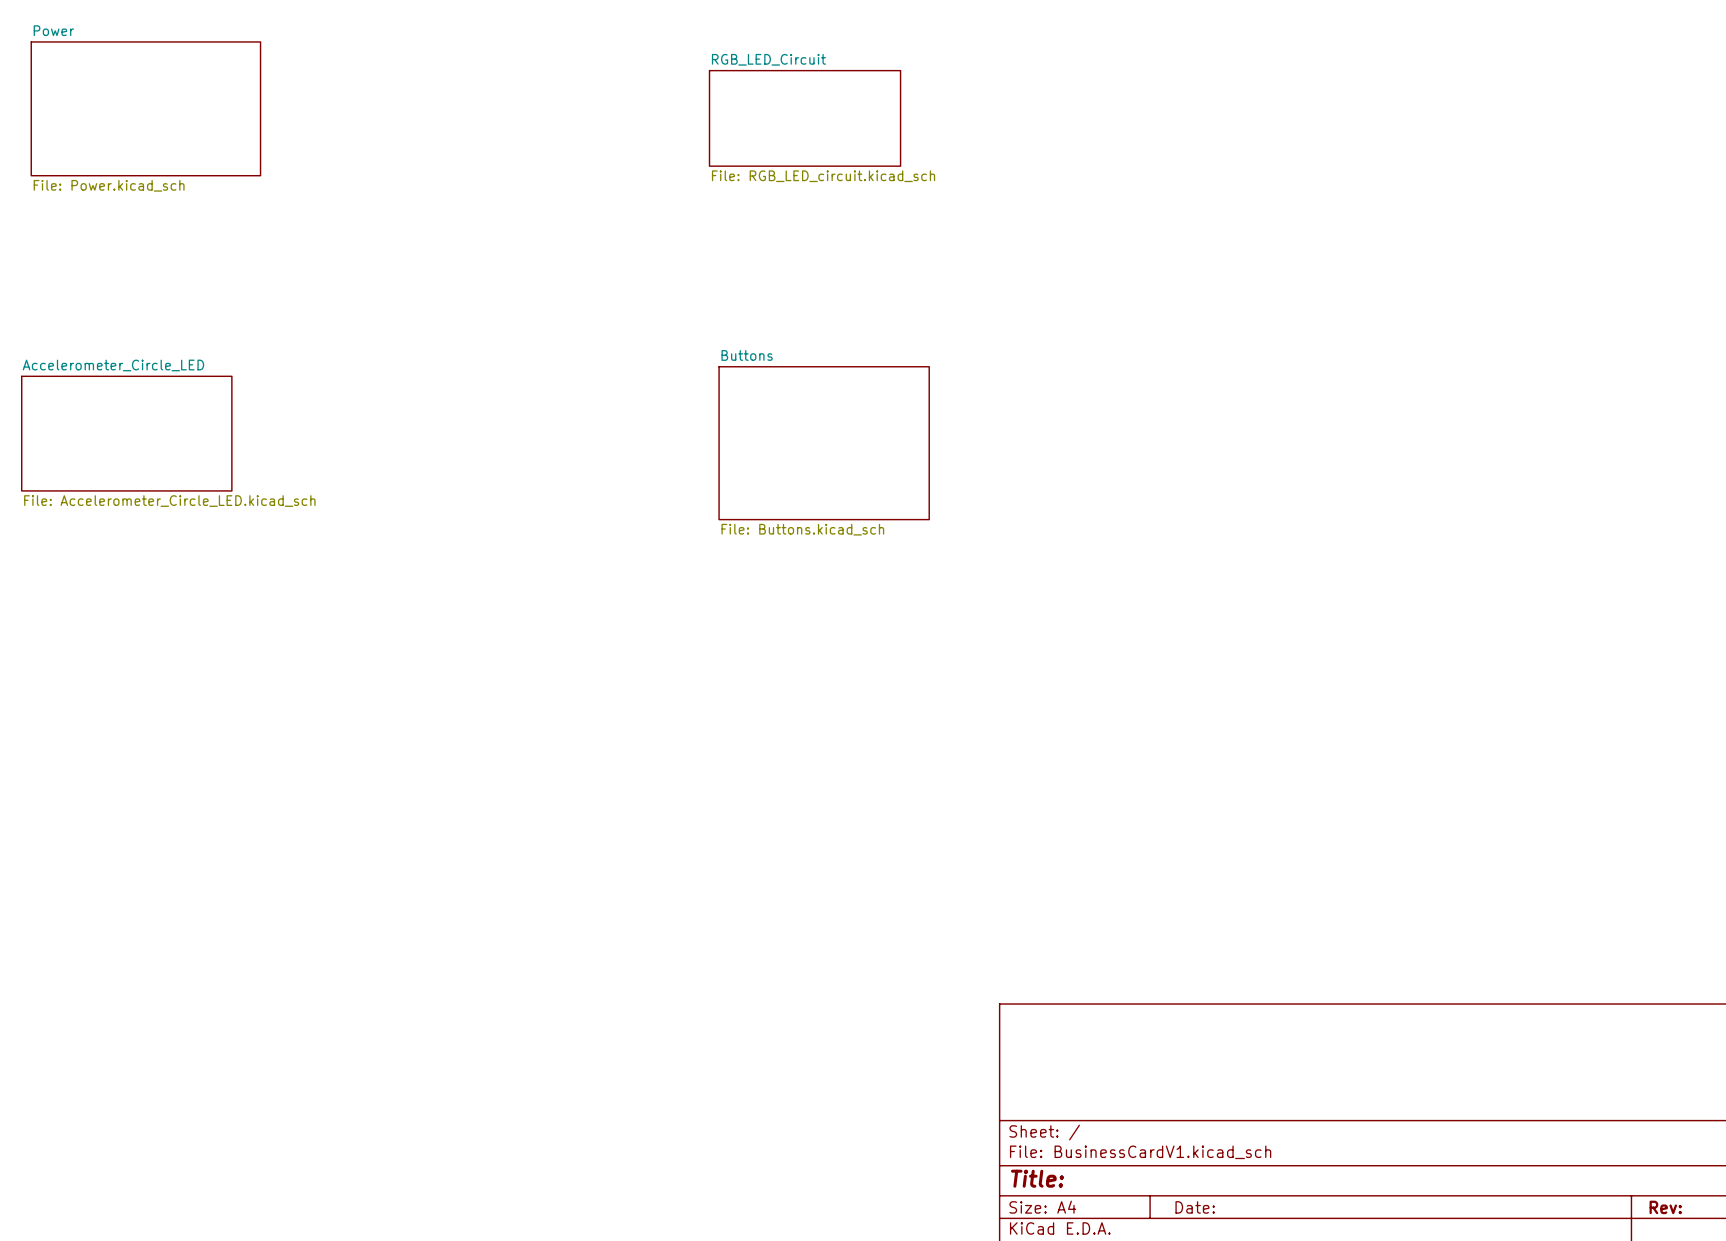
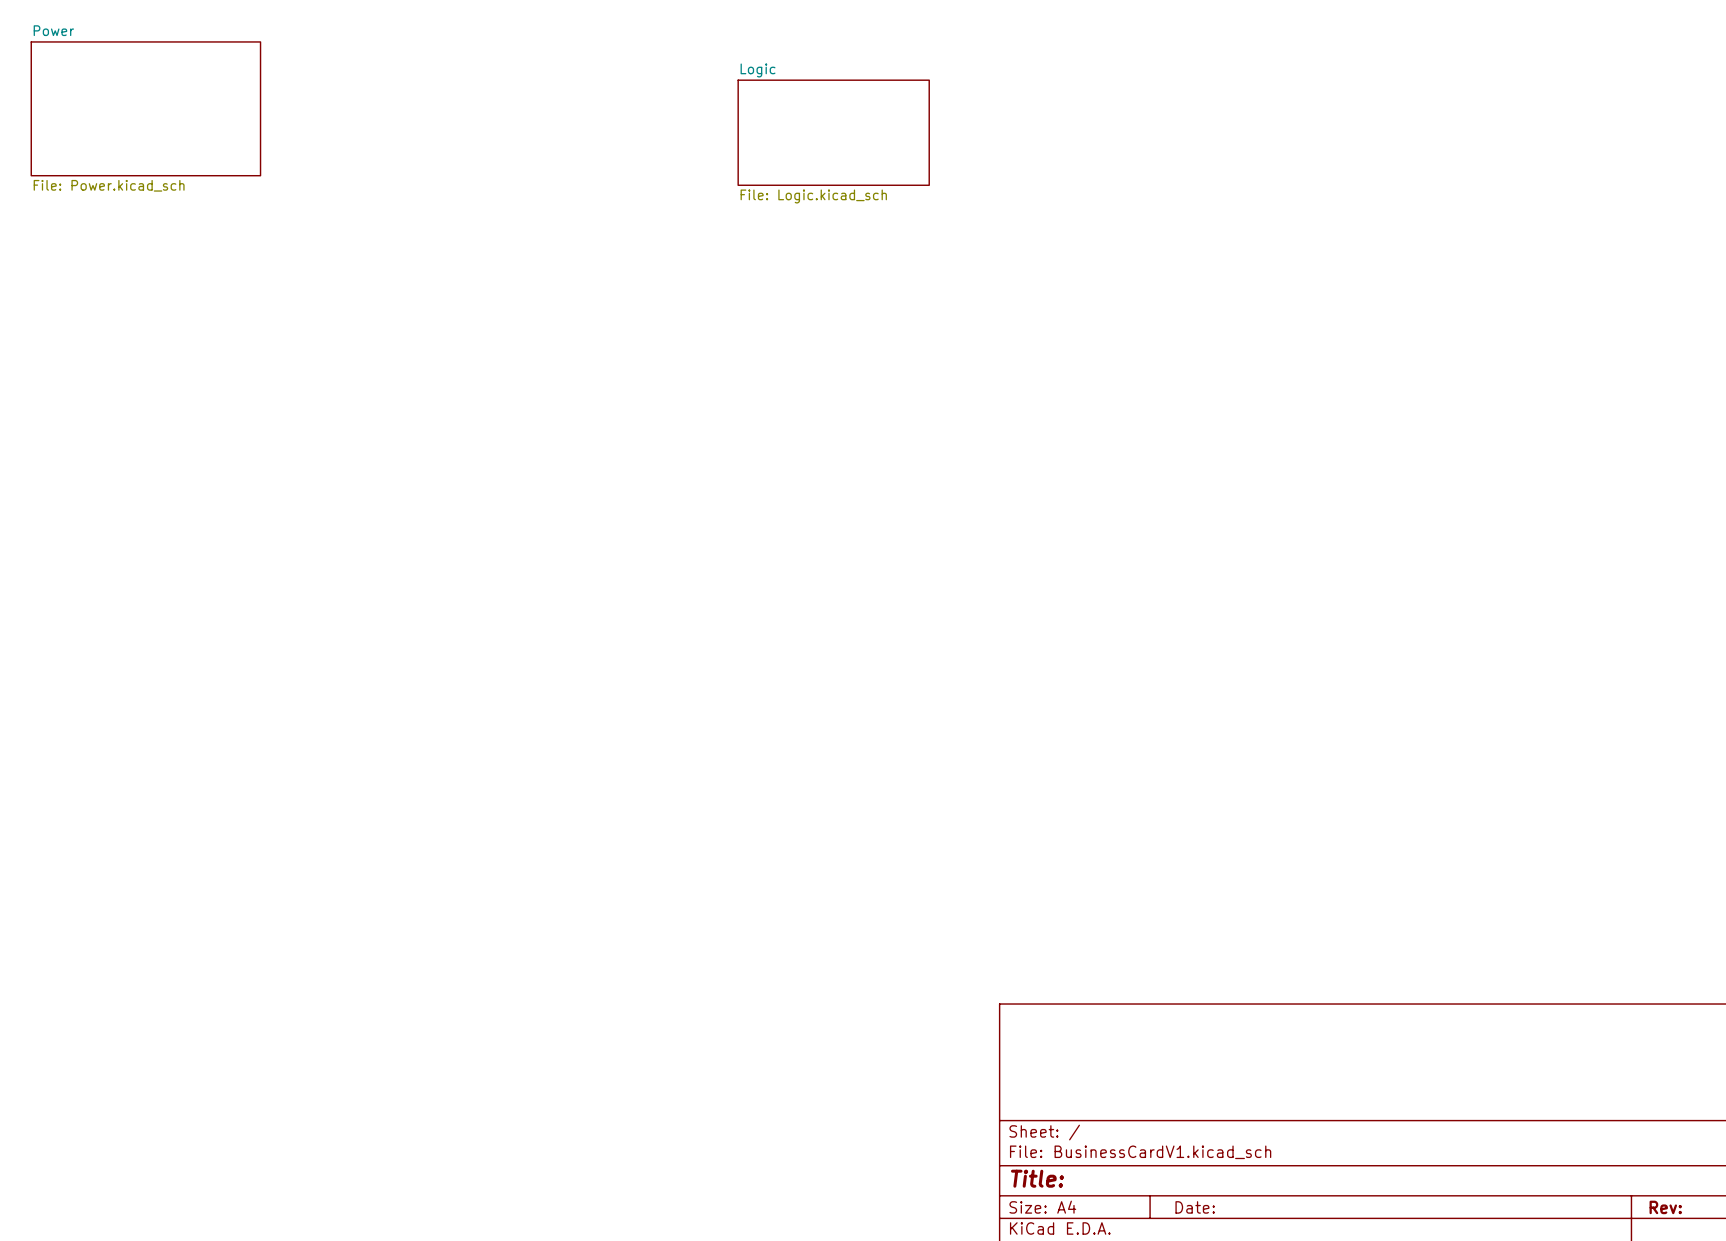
sheet RGB_LED_Circuit: File: RGB_LED_circuit.kicad_sch (805, 118) -> none
sheet Logic: none -> File: Logic.kicad_sch (833, 132)
sheet Accelerometer_Circle_LED: File: Accelerometer_Circle_LED.kicad_sch (126, 433) -> none
sheet Buttons: File: Buttons.kicad_sch (824, 443) -> none

